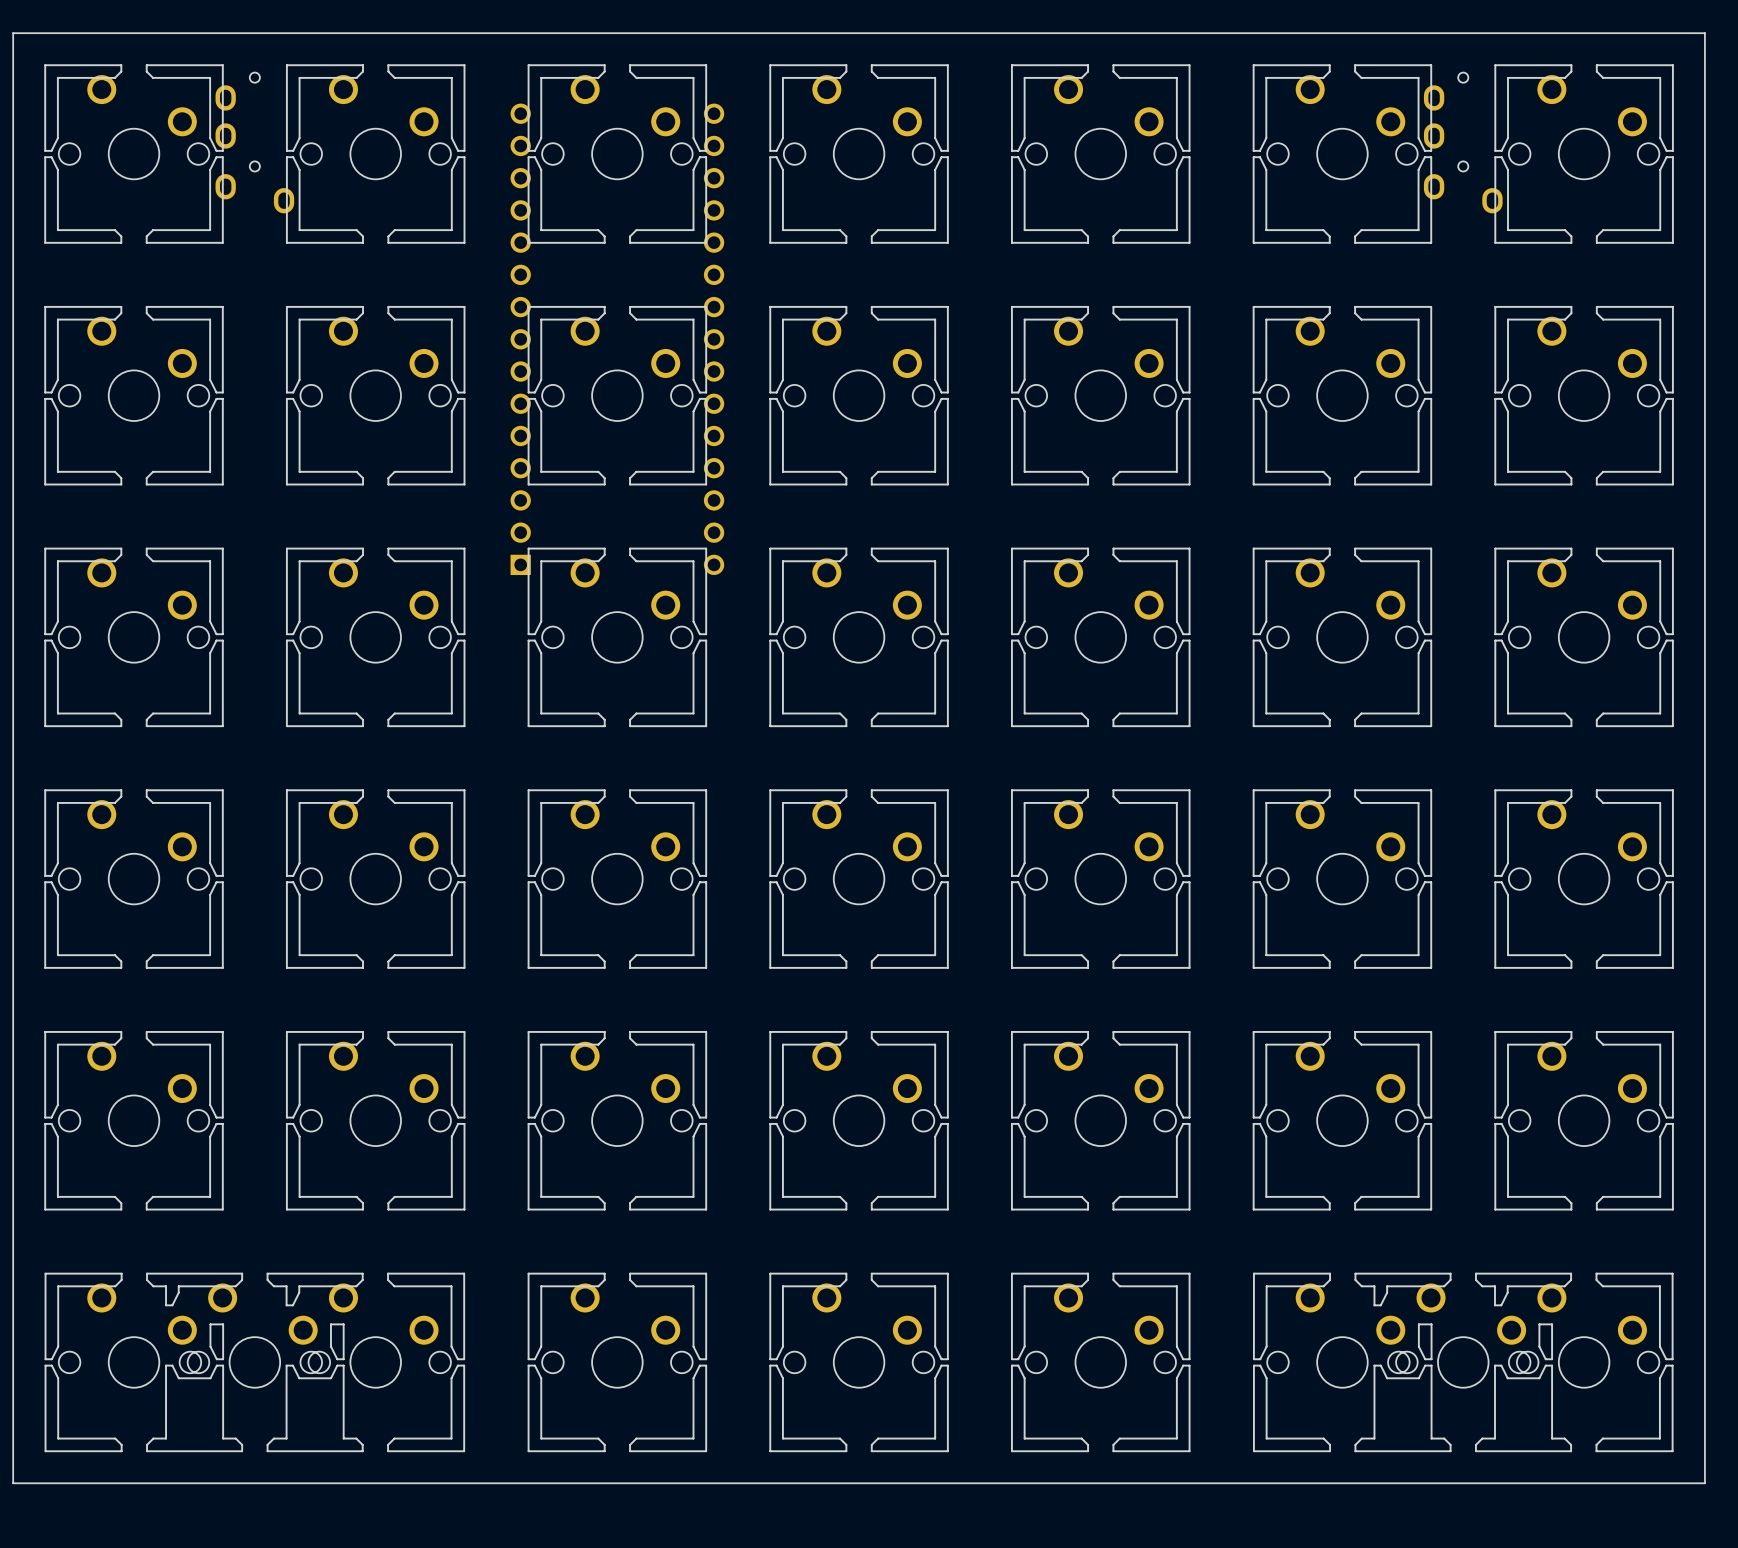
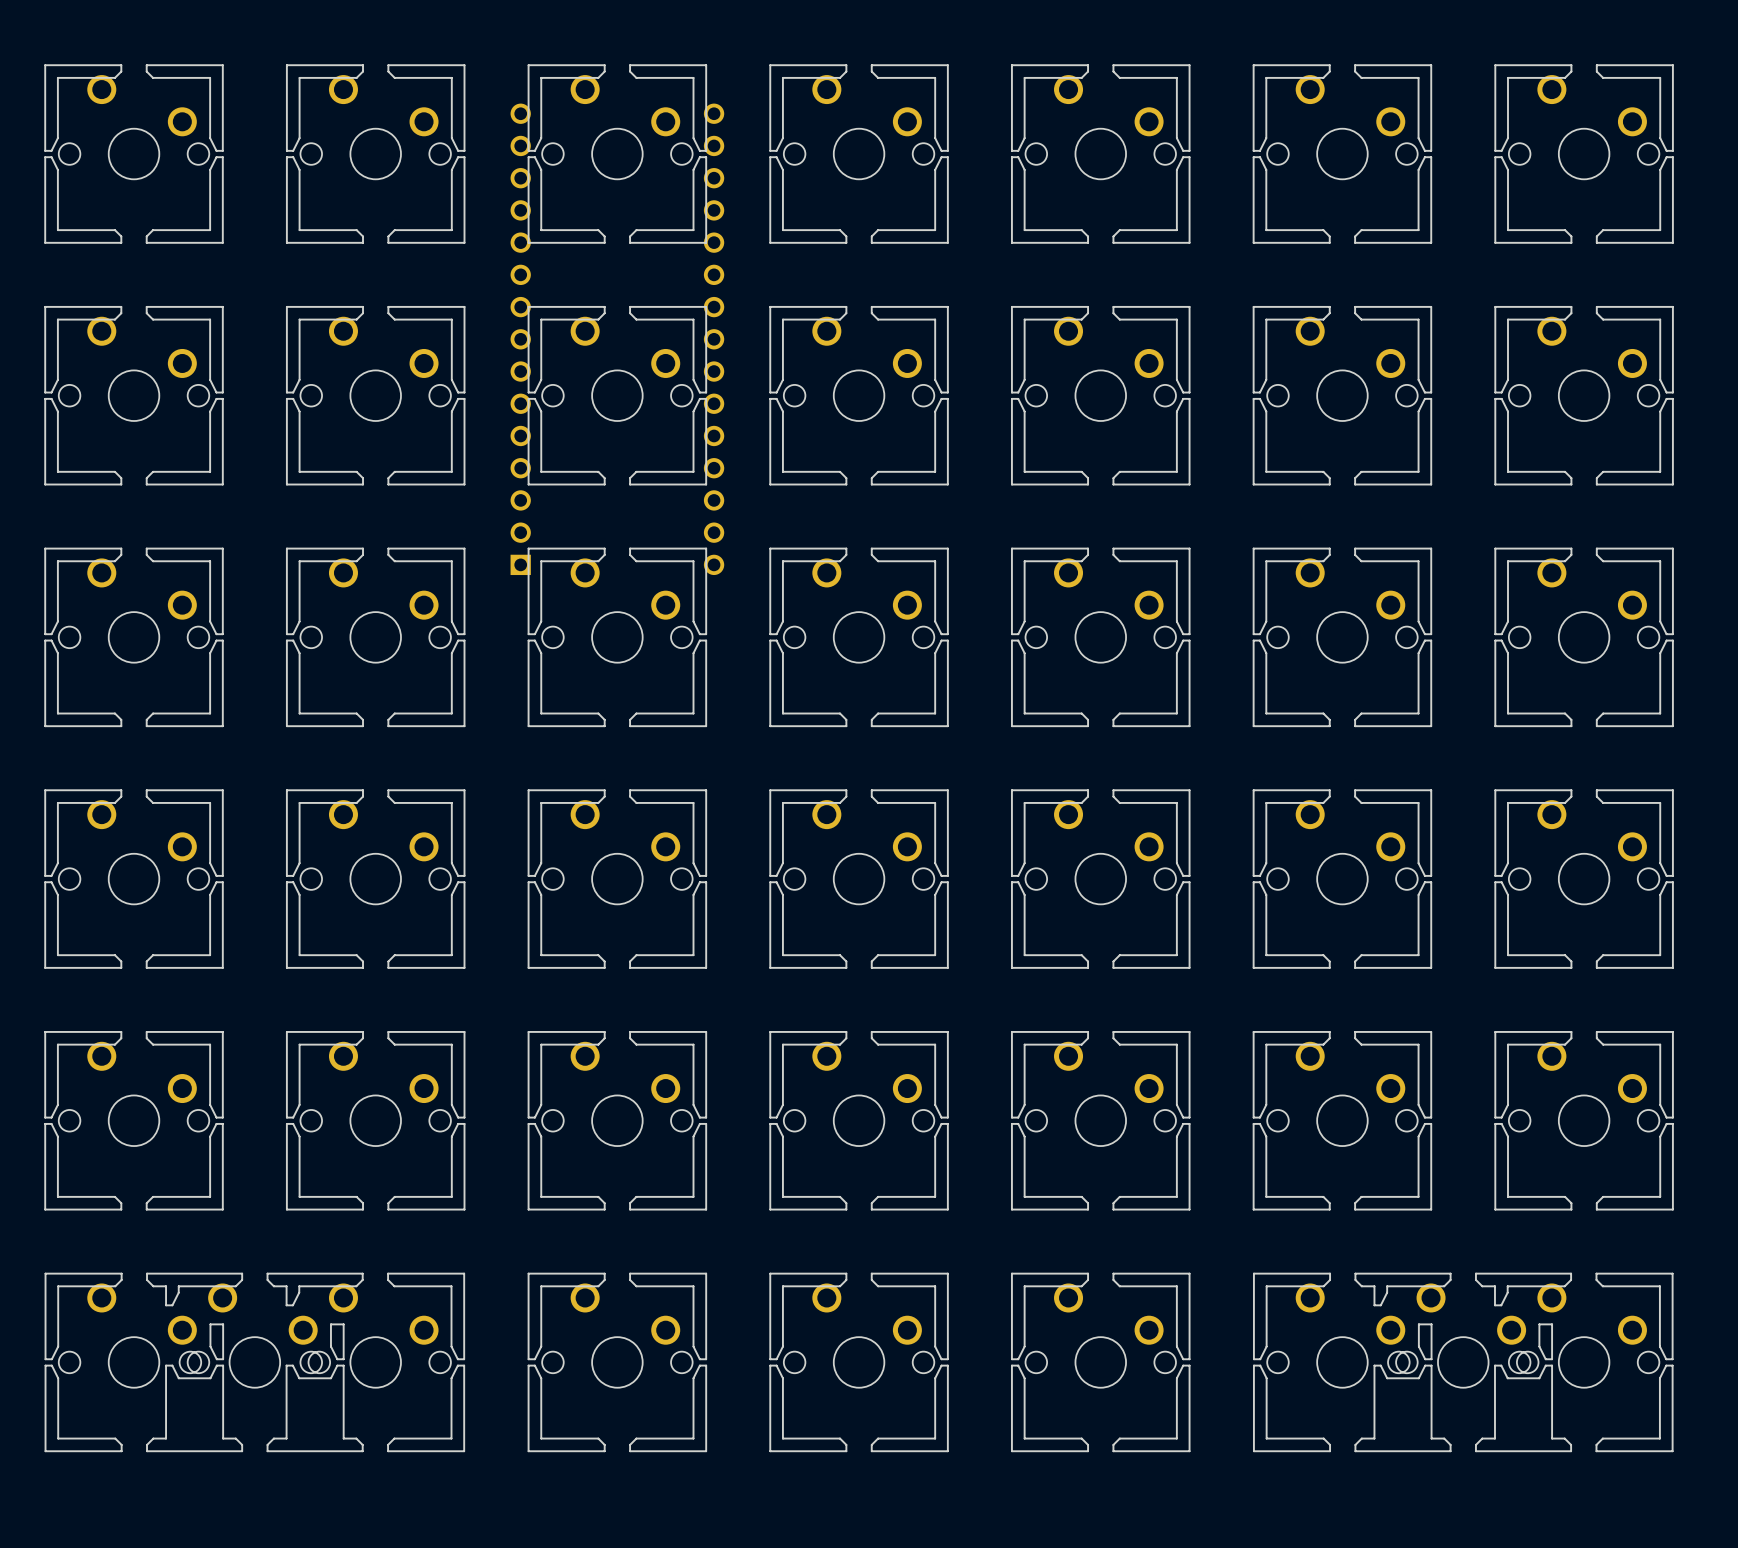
board edge: (1704, 33) (1704, 1483) (13, 1483) (13, 33) (1704, 33) -> none
part: (254, 142) -> none
part: (1463, 142) -> none

